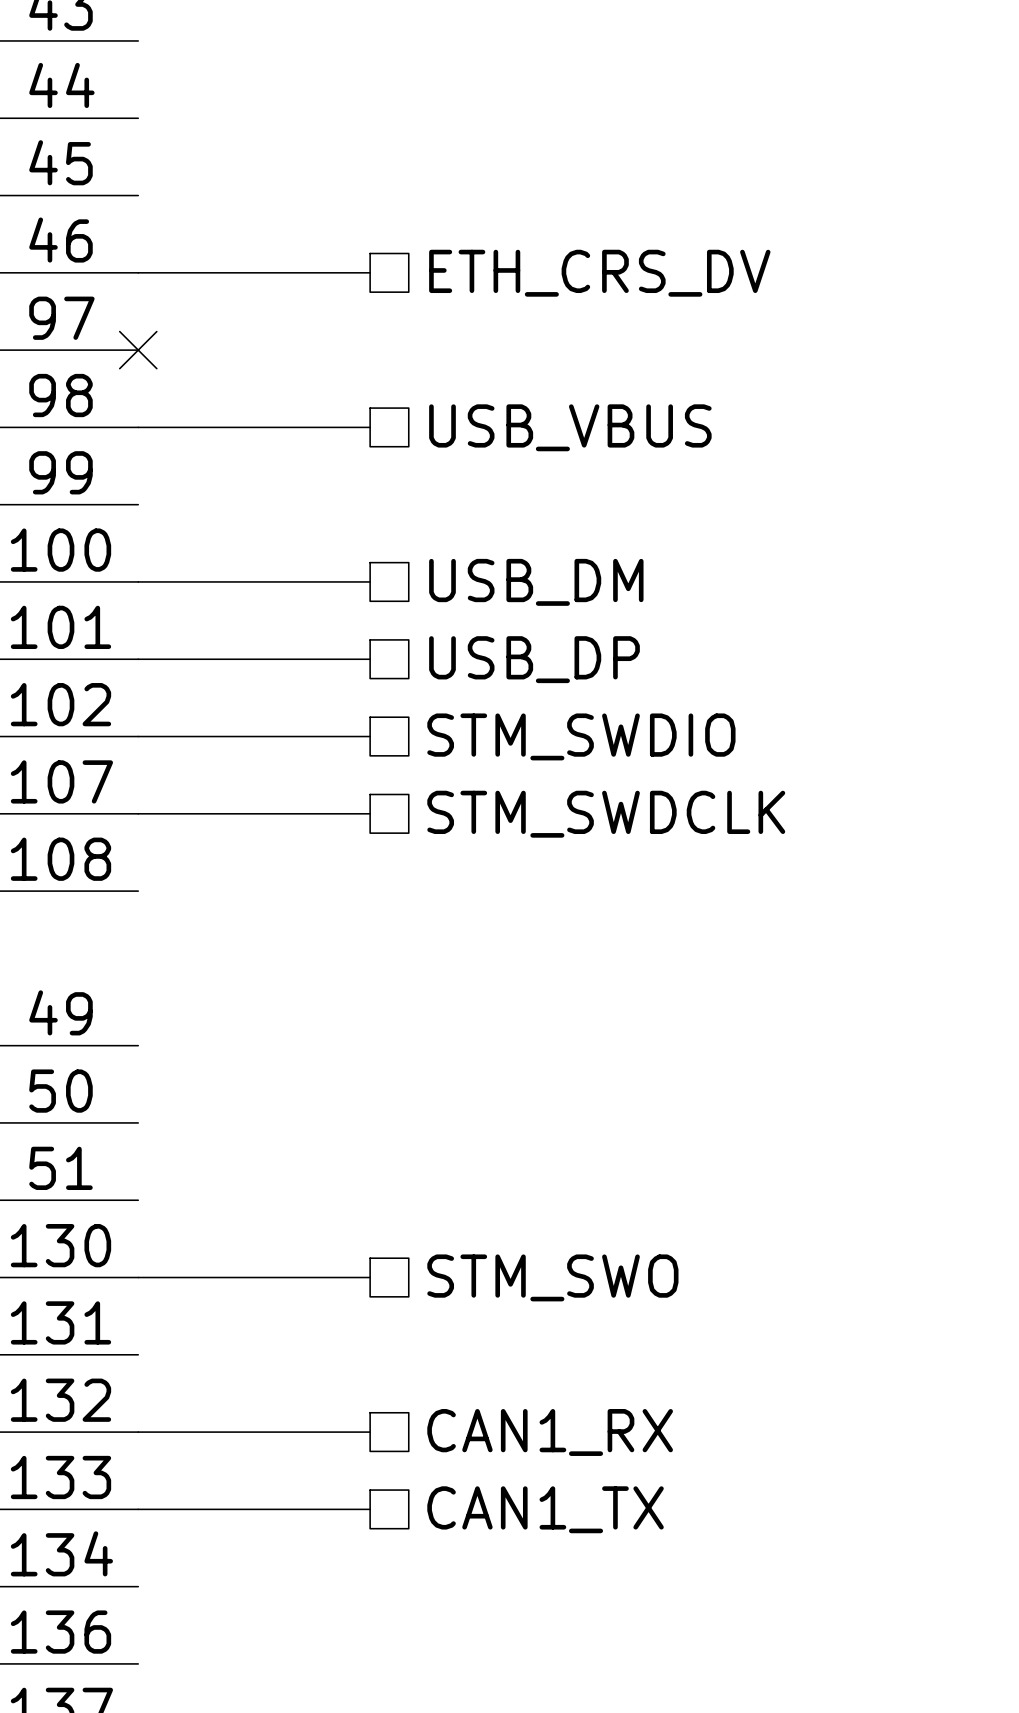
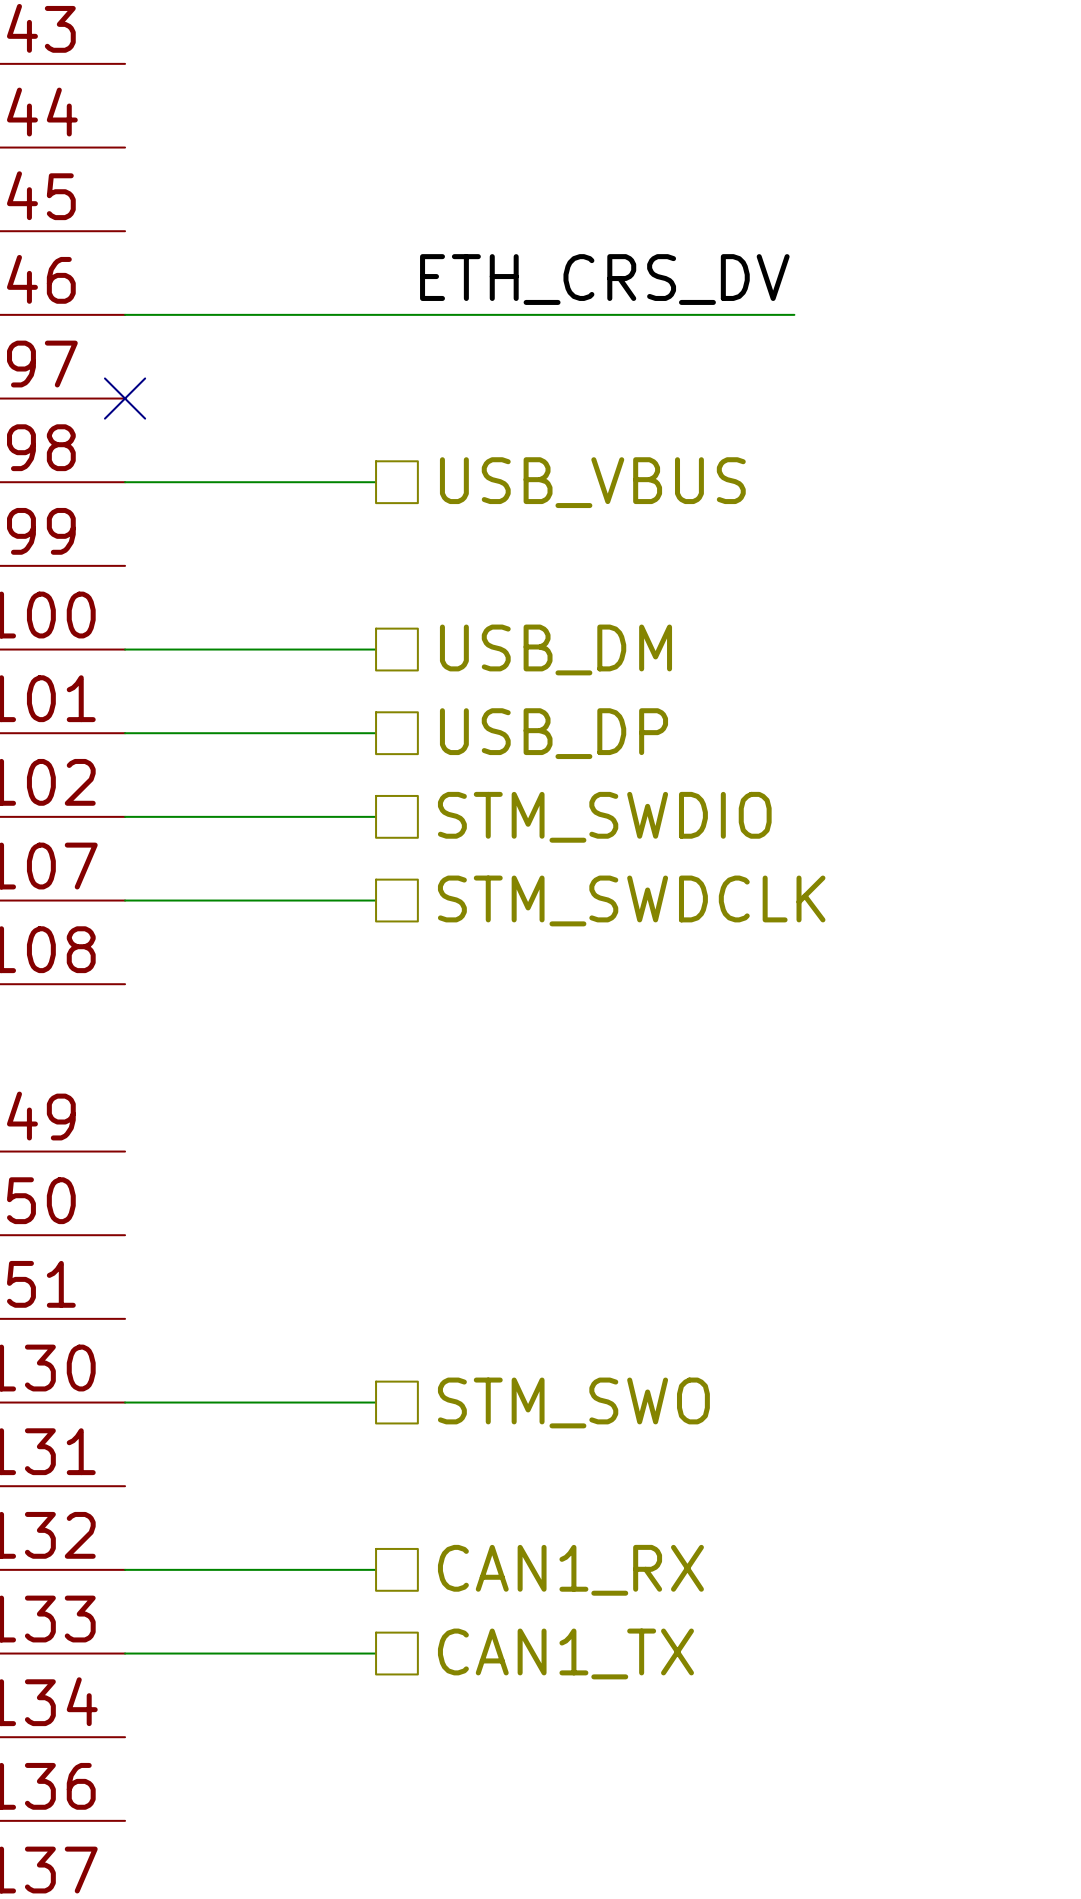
label: none -> ETH_CRS_DV (604, 279)
wire: none -> (376, 314) (794, 314)
hierarchical label: ETH_CRS_DV (599, 273) -> none

